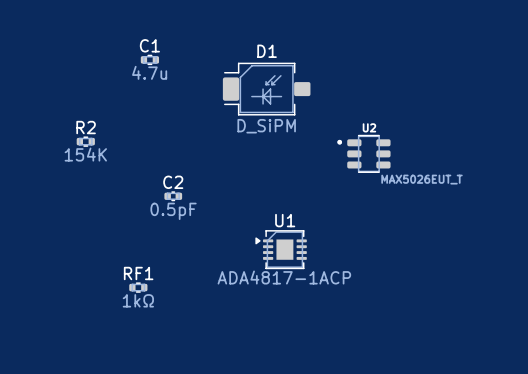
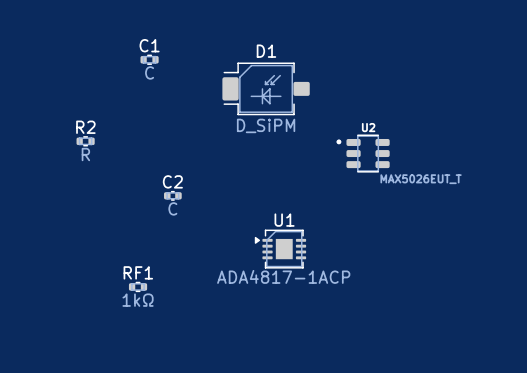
C1 value: 4.7u (149, 72) -> C (149, 72)
R2 value: 154K (85, 154) -> R (85, 154)
C2 value: 0.5pF (173, 211) -> C (172, 208)

